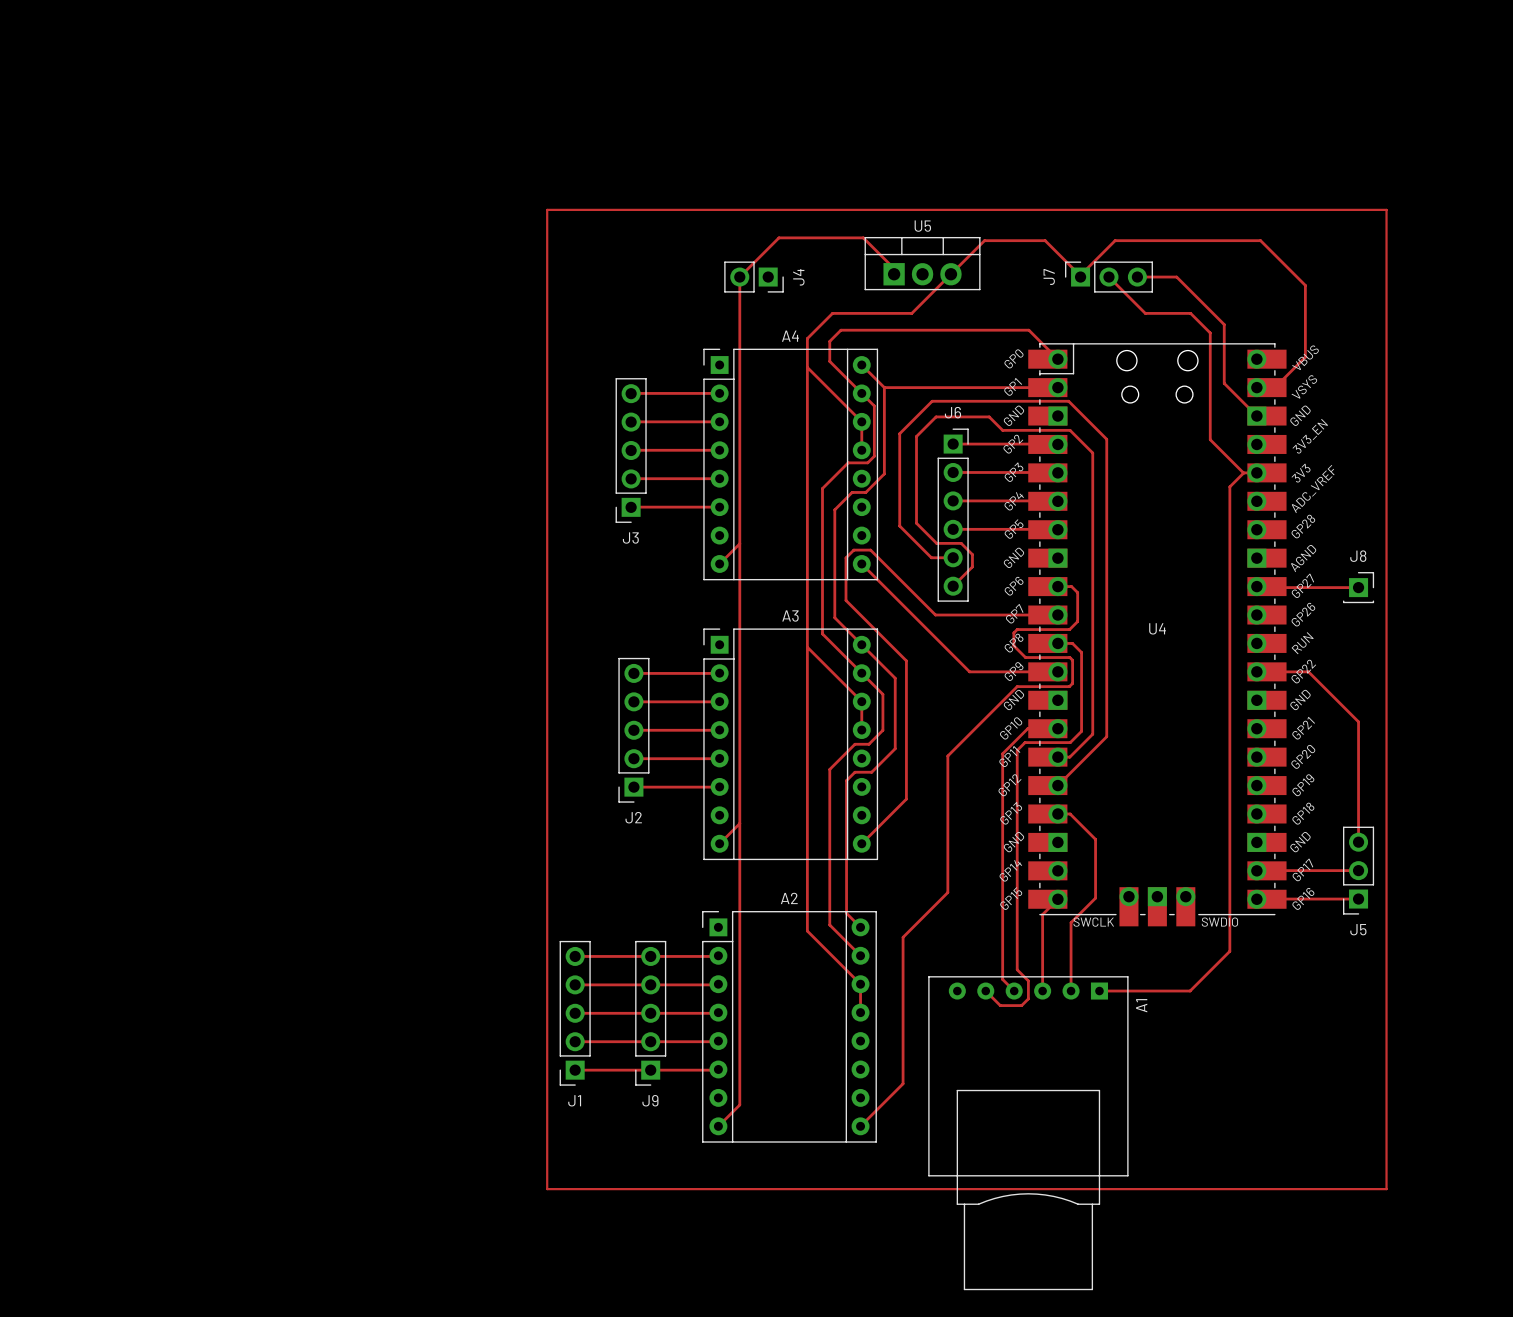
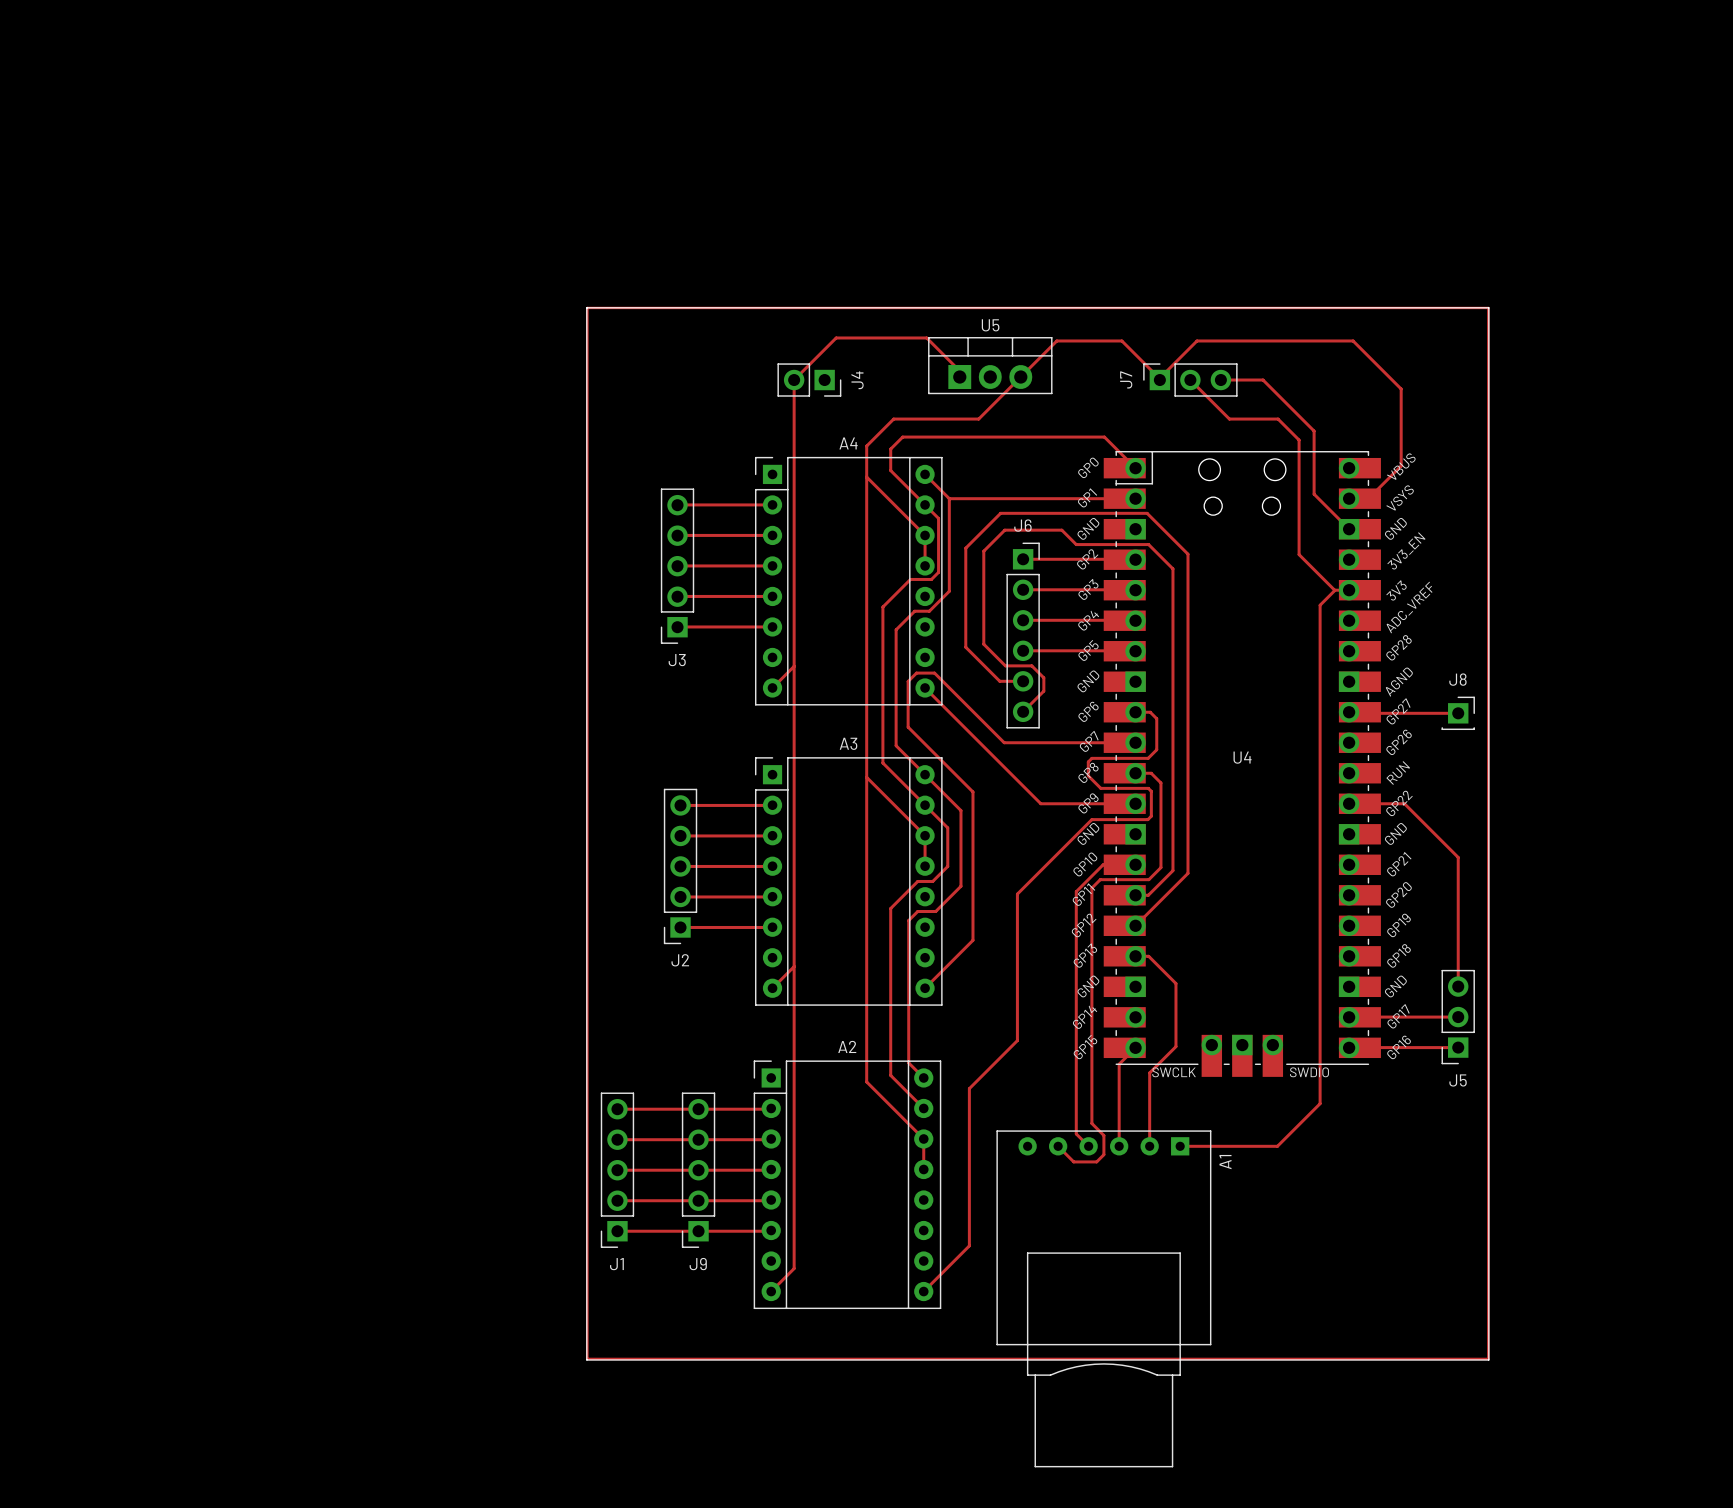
board edge: none -> (586, 307) (1488, 307) (1488, 1359) (586, 1359) (586, 307)

